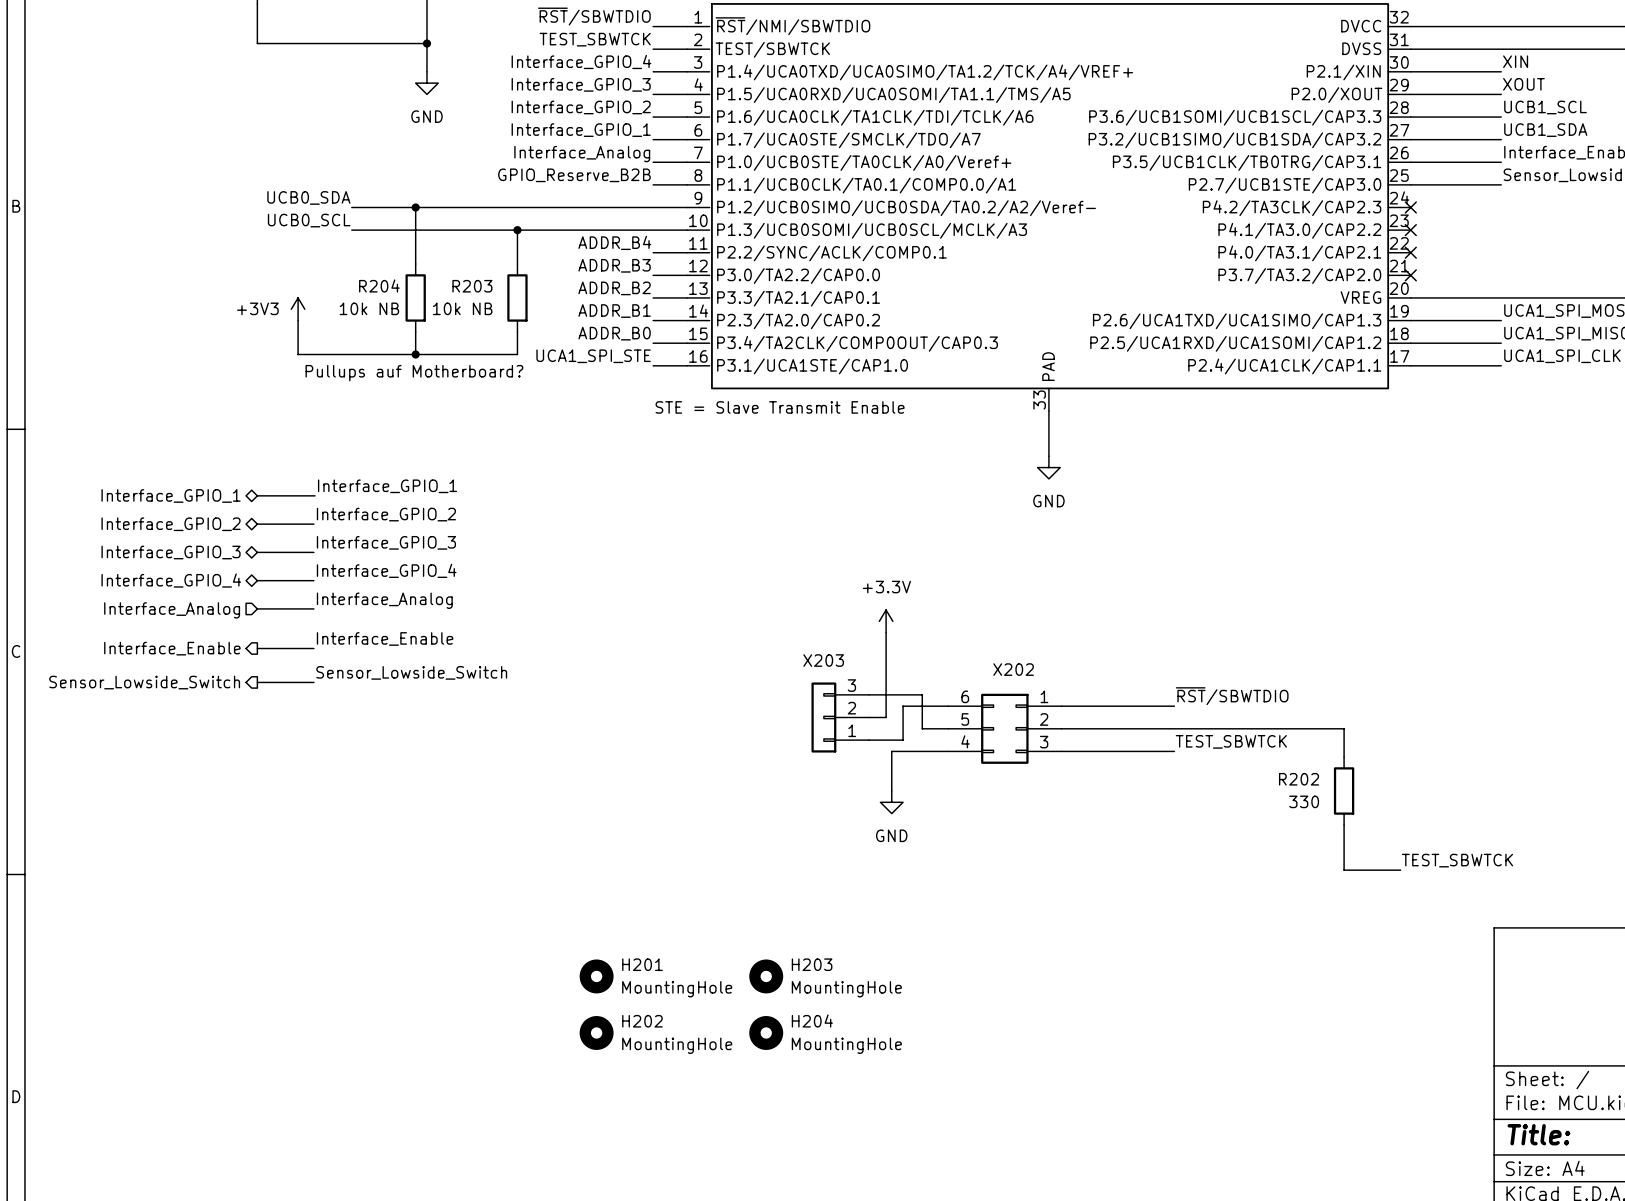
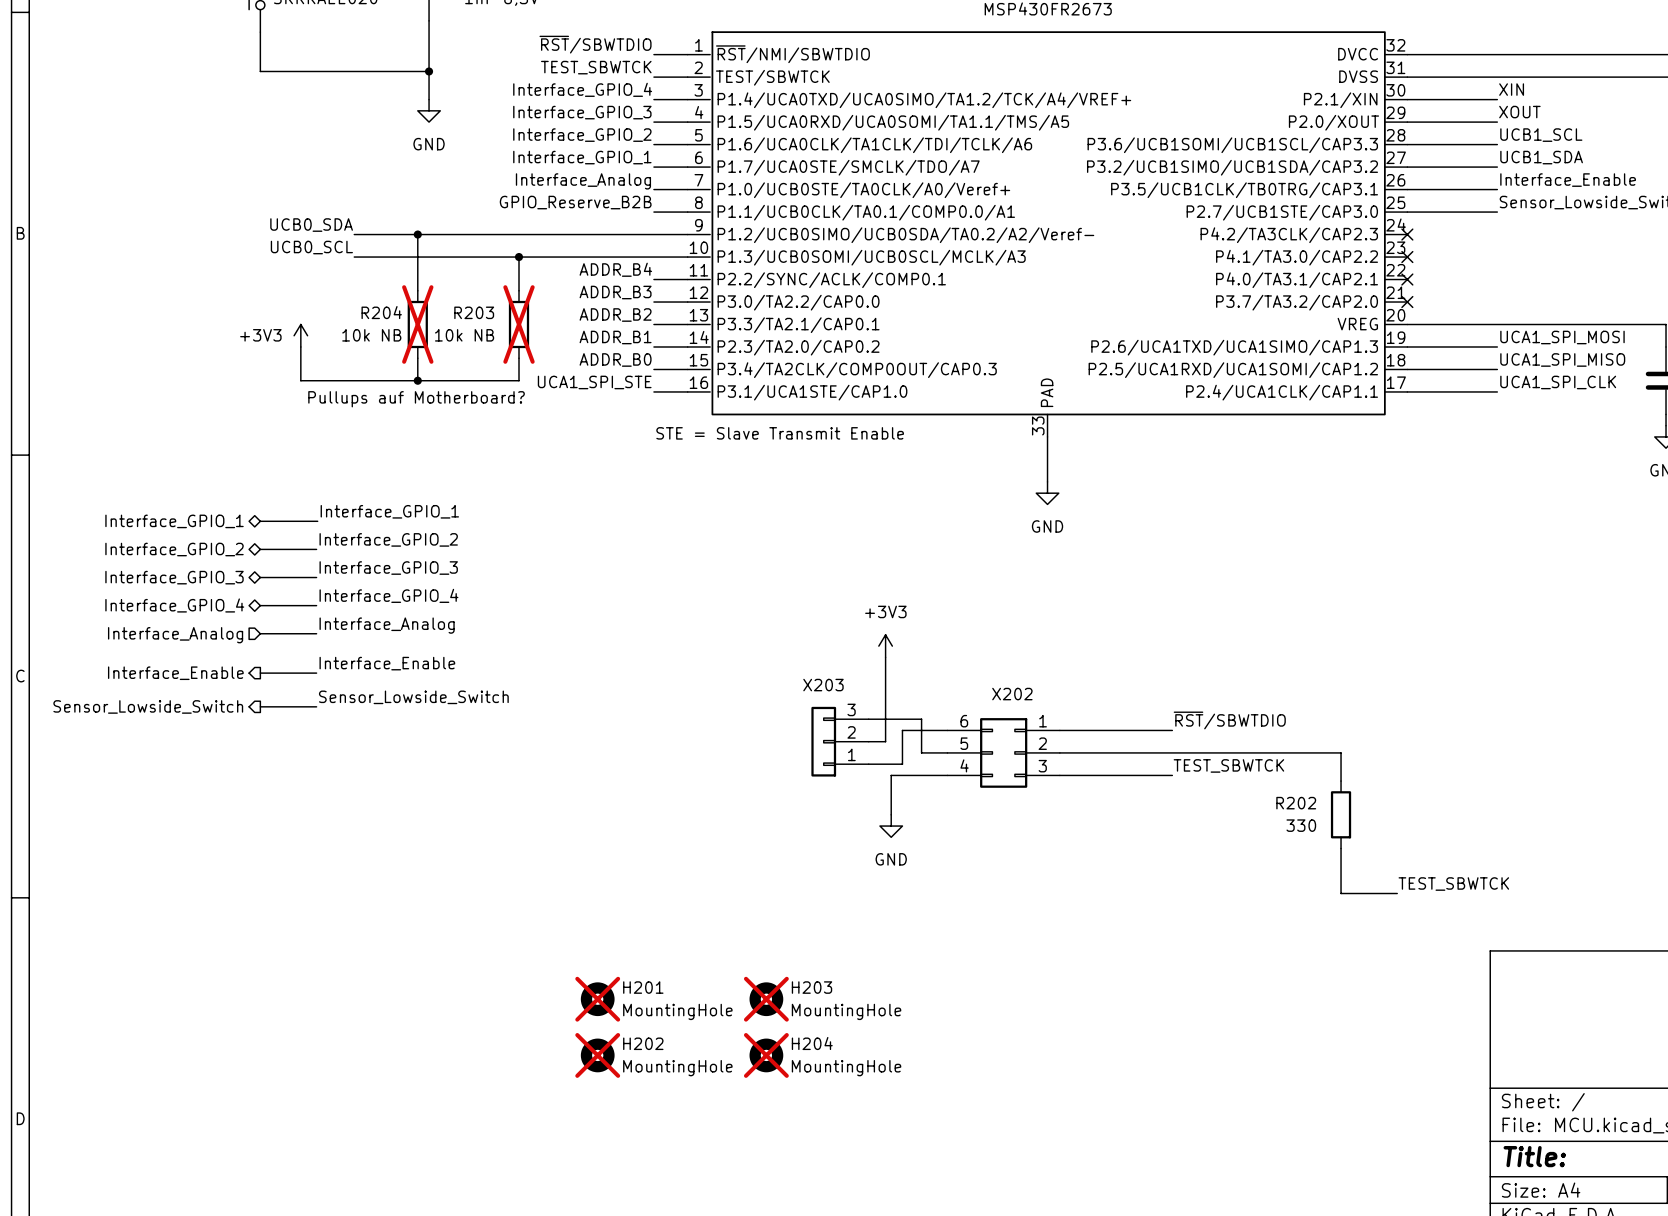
R204 do-not-place cross: none -> (417, 324)
R203 do-not-place cross: none -> (518, 324)
power symbol: +3.3V (886, 621) -> +3V3 (885, 646)
H201 do-not-place cross: none -> (597, 999)
H203 do-not-place cross: none -> (766, 999)
H202 do-not-place cross: none -> (597, 1055)
H204 do-not-place cross: none -> (766, 1055)

